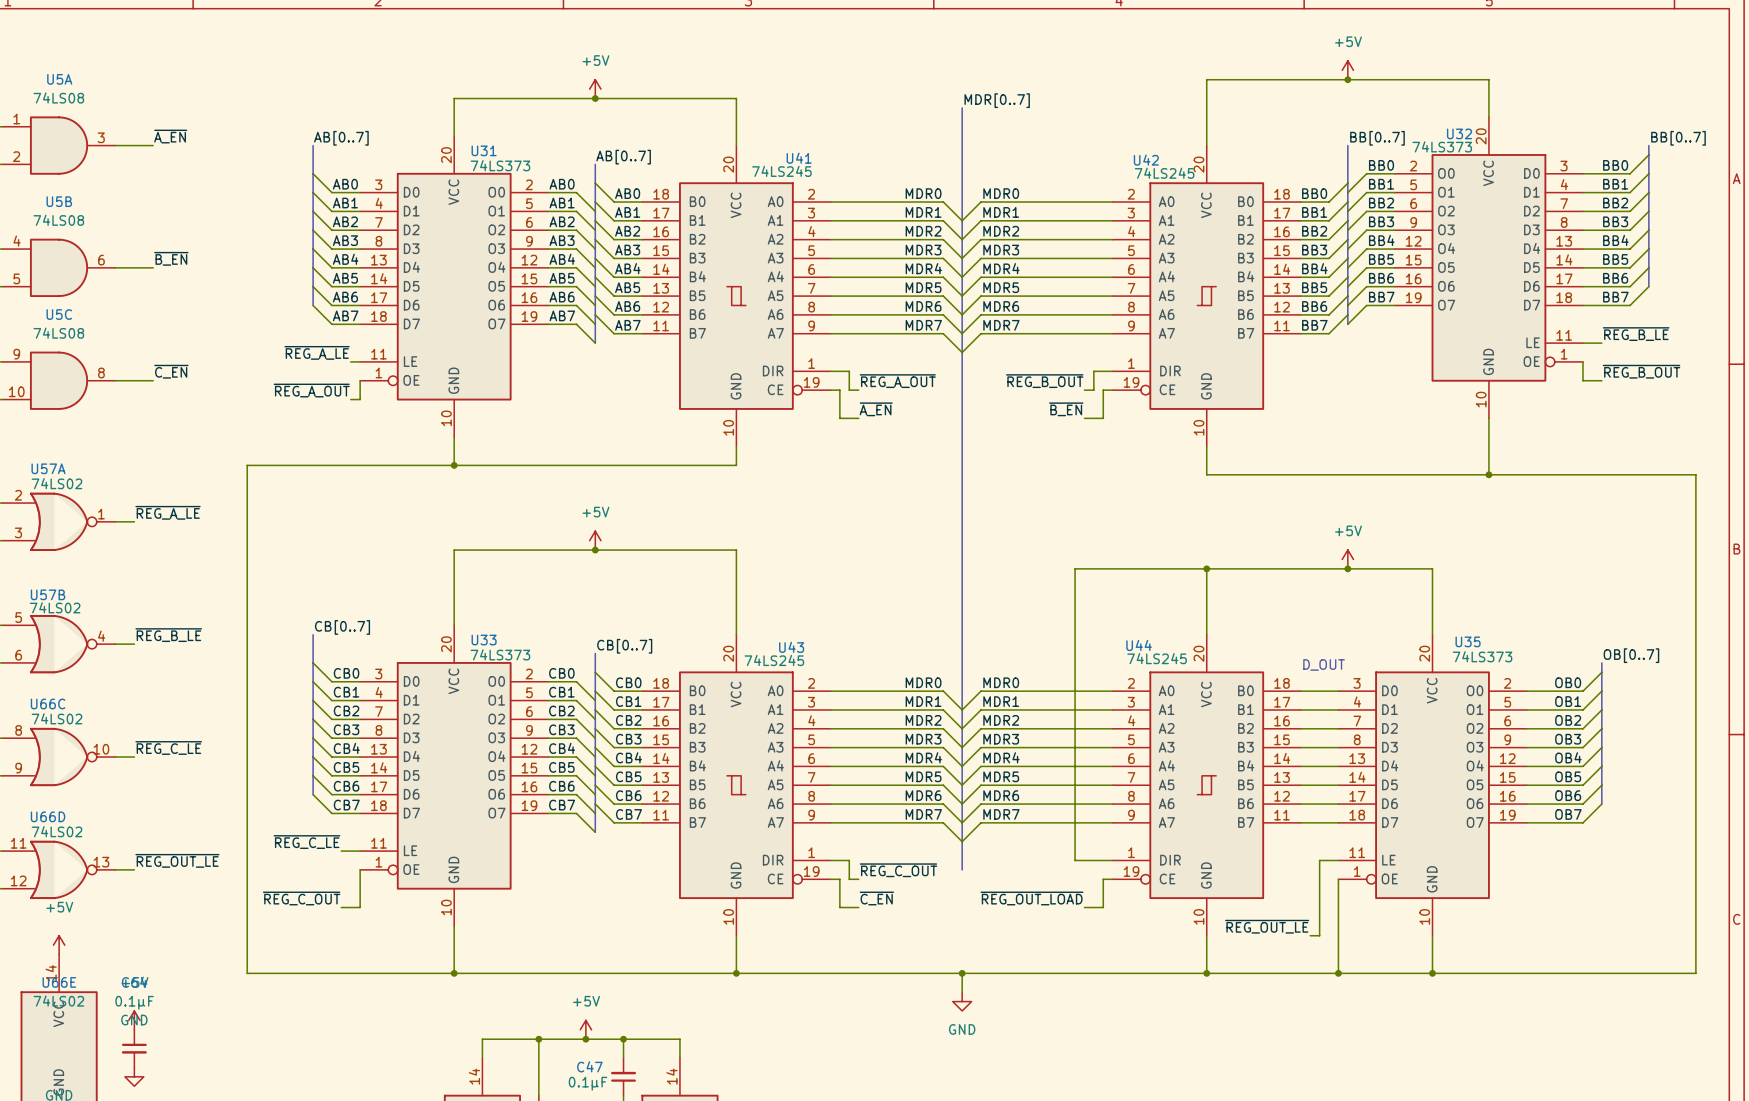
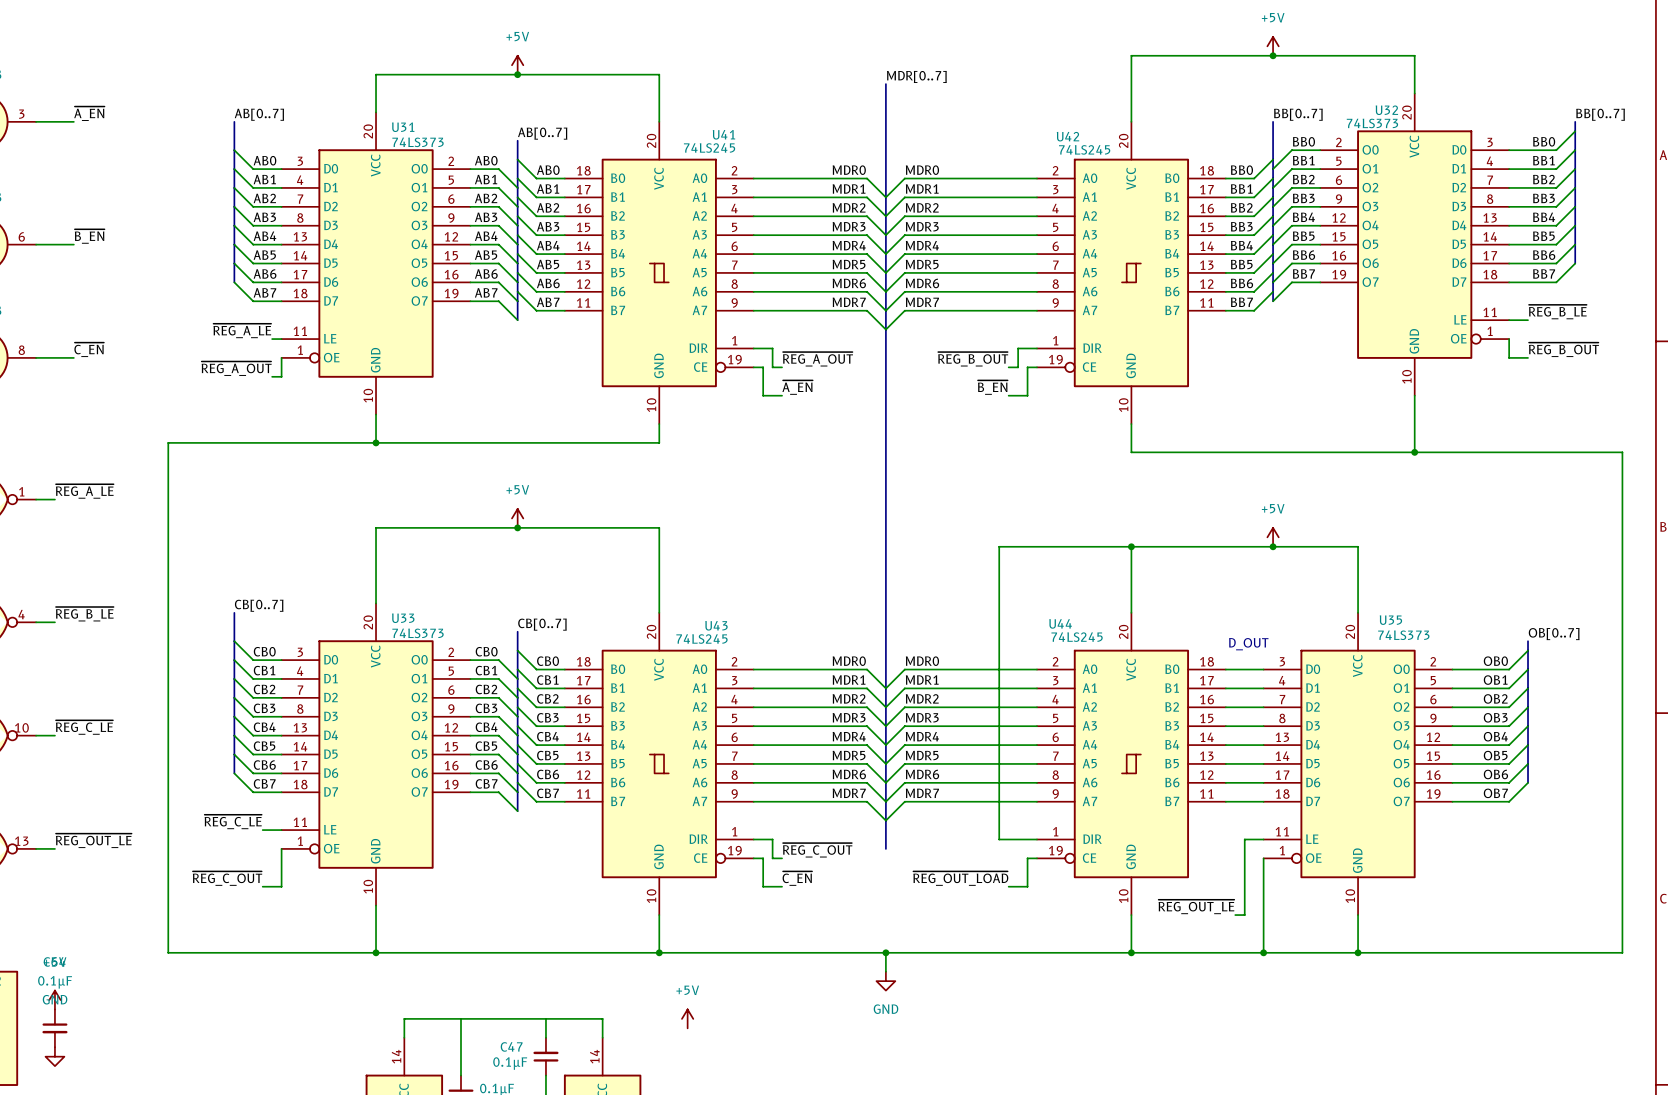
power symbol position: +5V (585, 1029) -> +5V (687, 1018)
junction: (538, 1039) -> none
junction: (585, 1039) -> none
junction: (623, 1039) -> none

